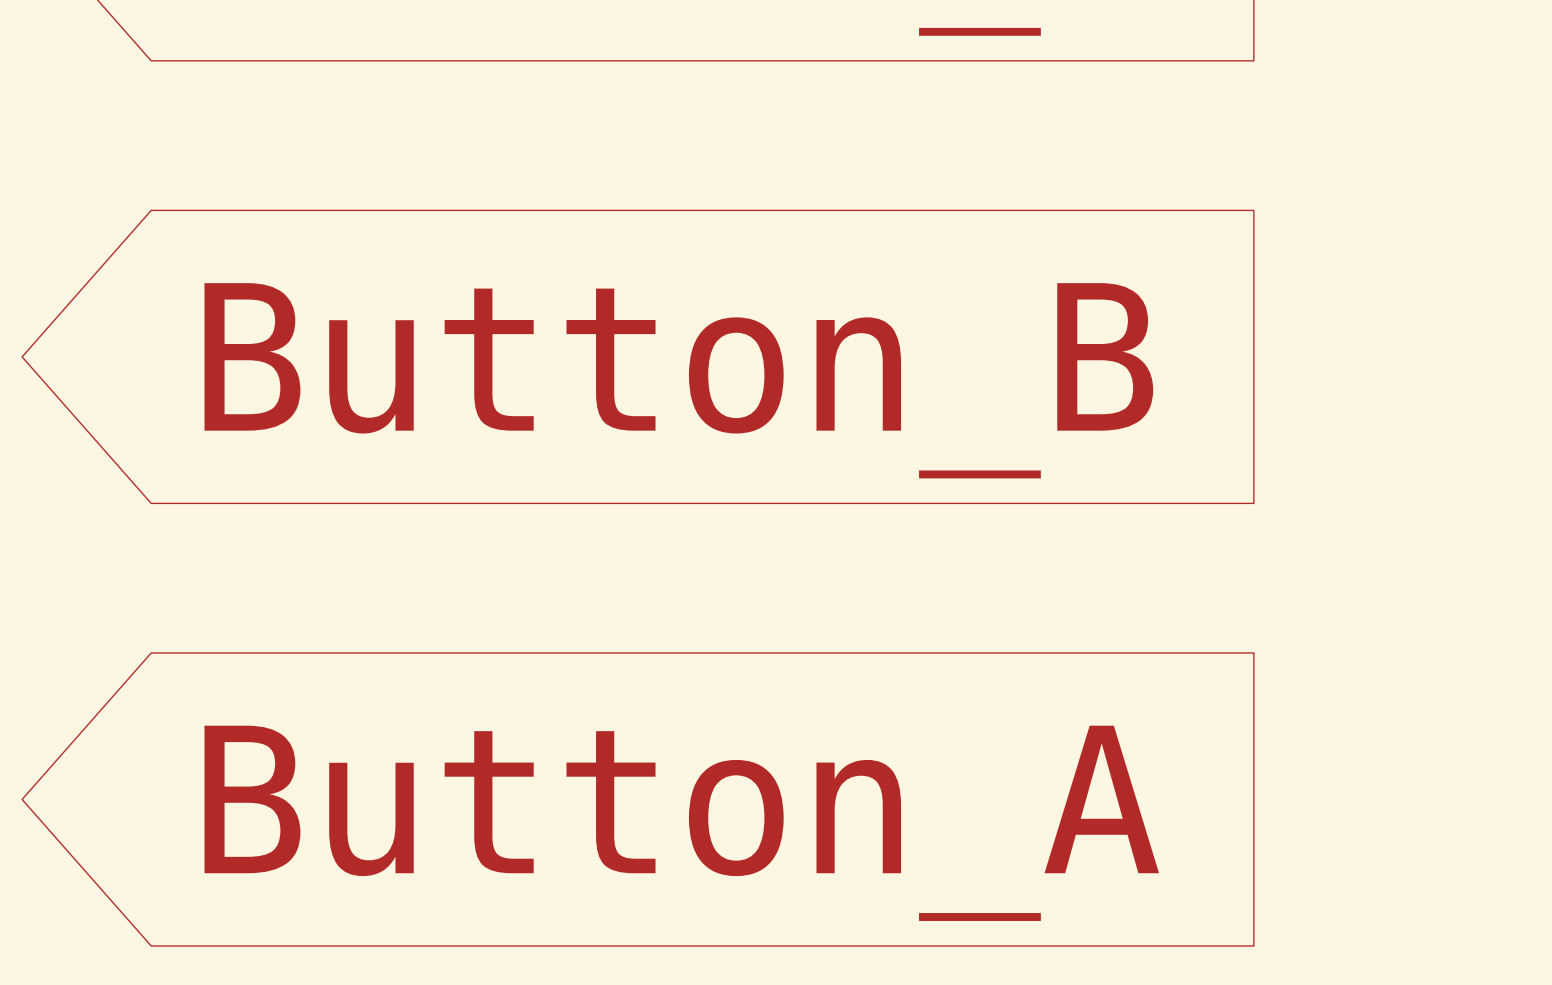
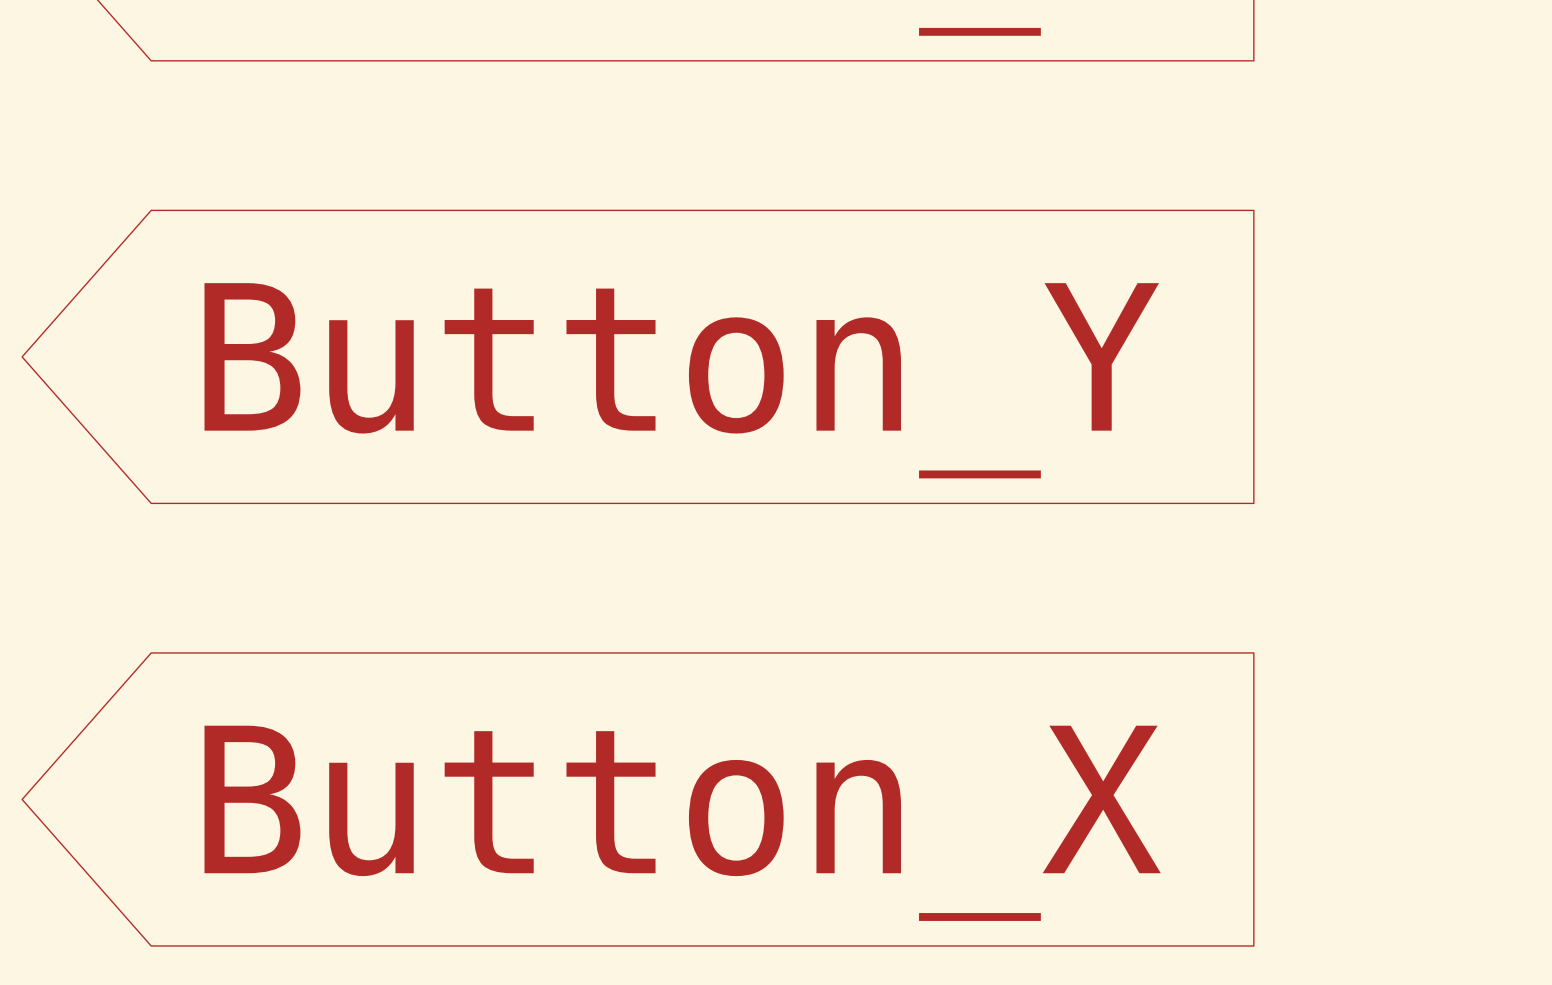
global label: Button_B (678, 380) -> Button_Y (681, 380)
global label: Button_A (681, 823) -> Button_X (682, 823)

